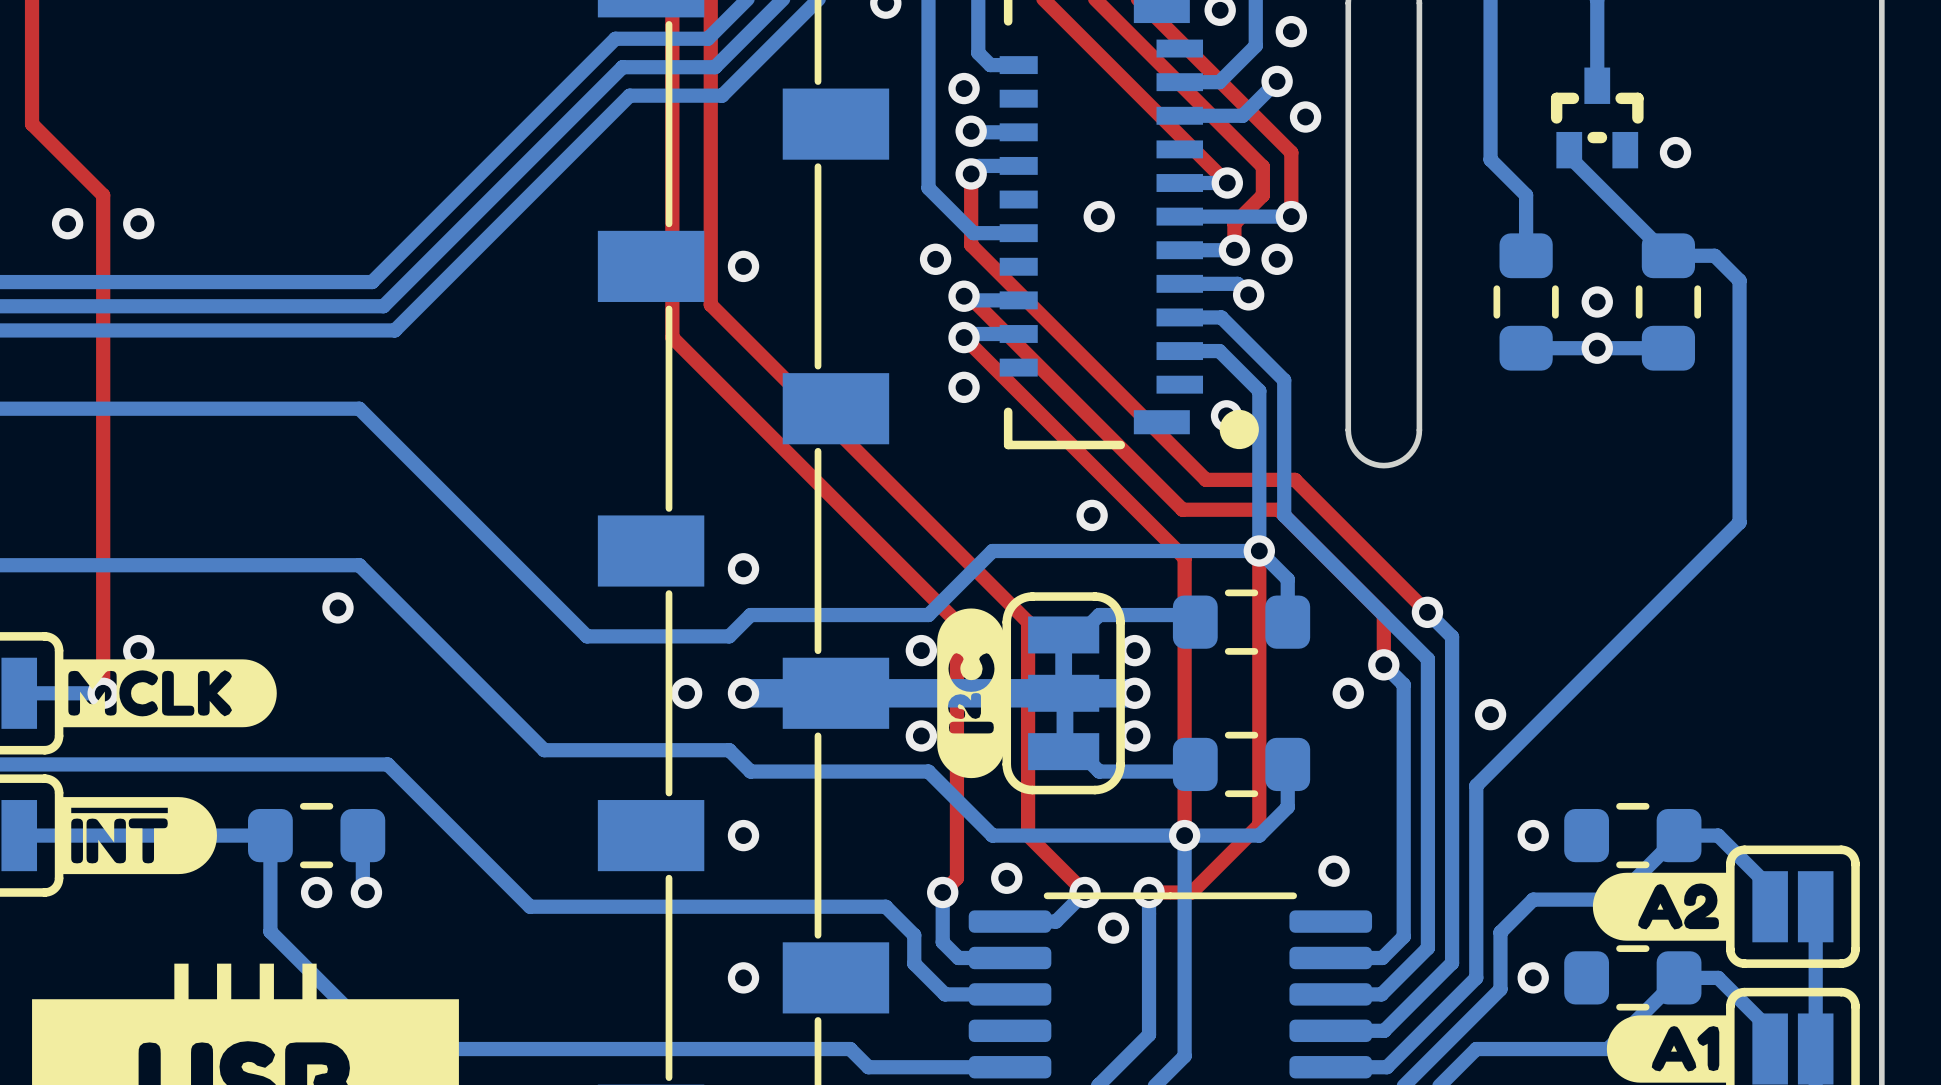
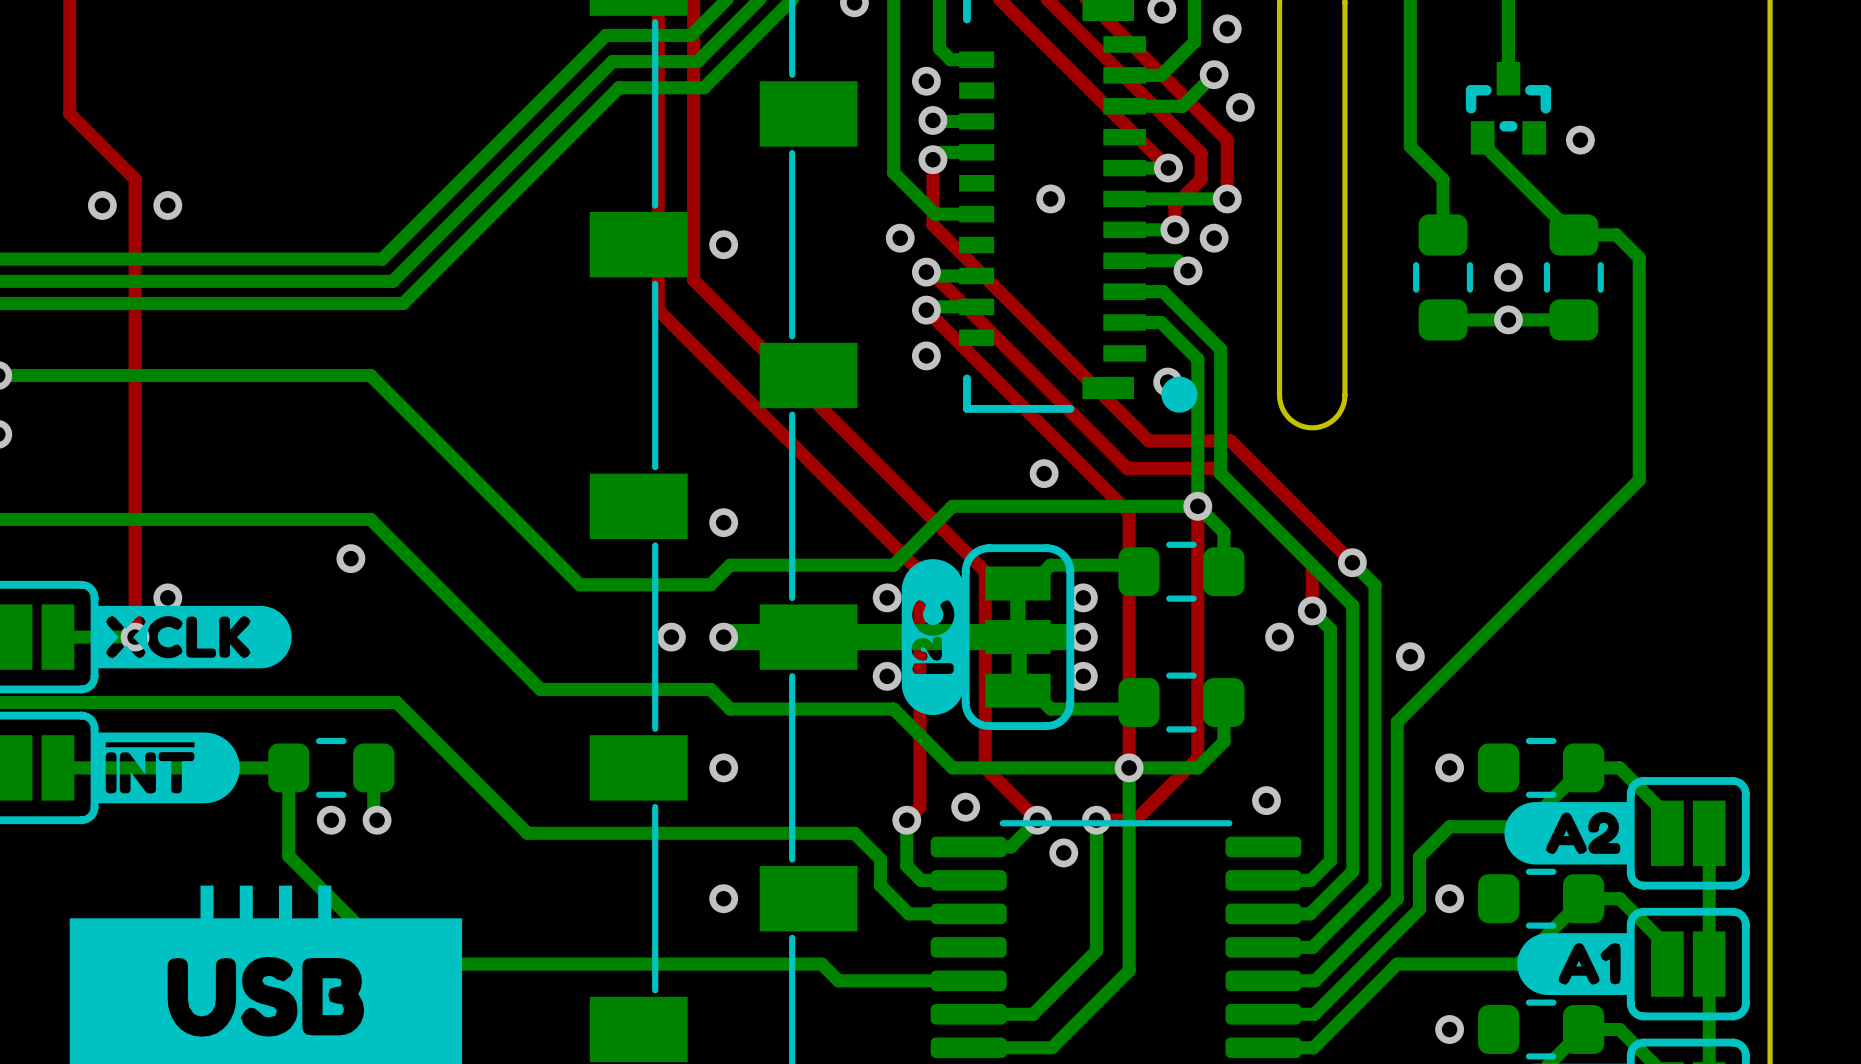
drawing shape: [57, 659, 277, 728] -> [96, 605, 292, 669]

